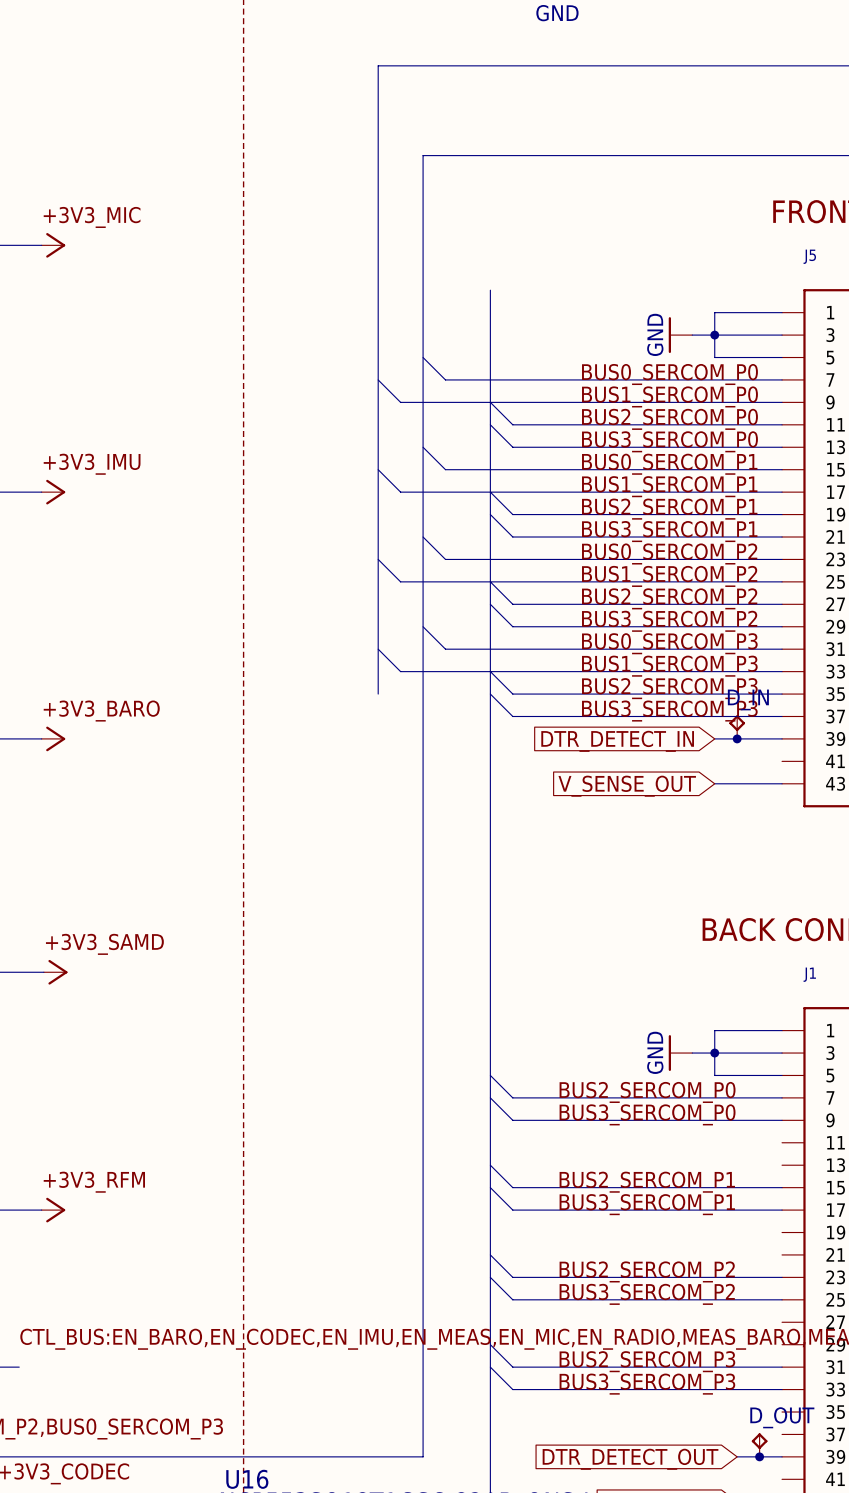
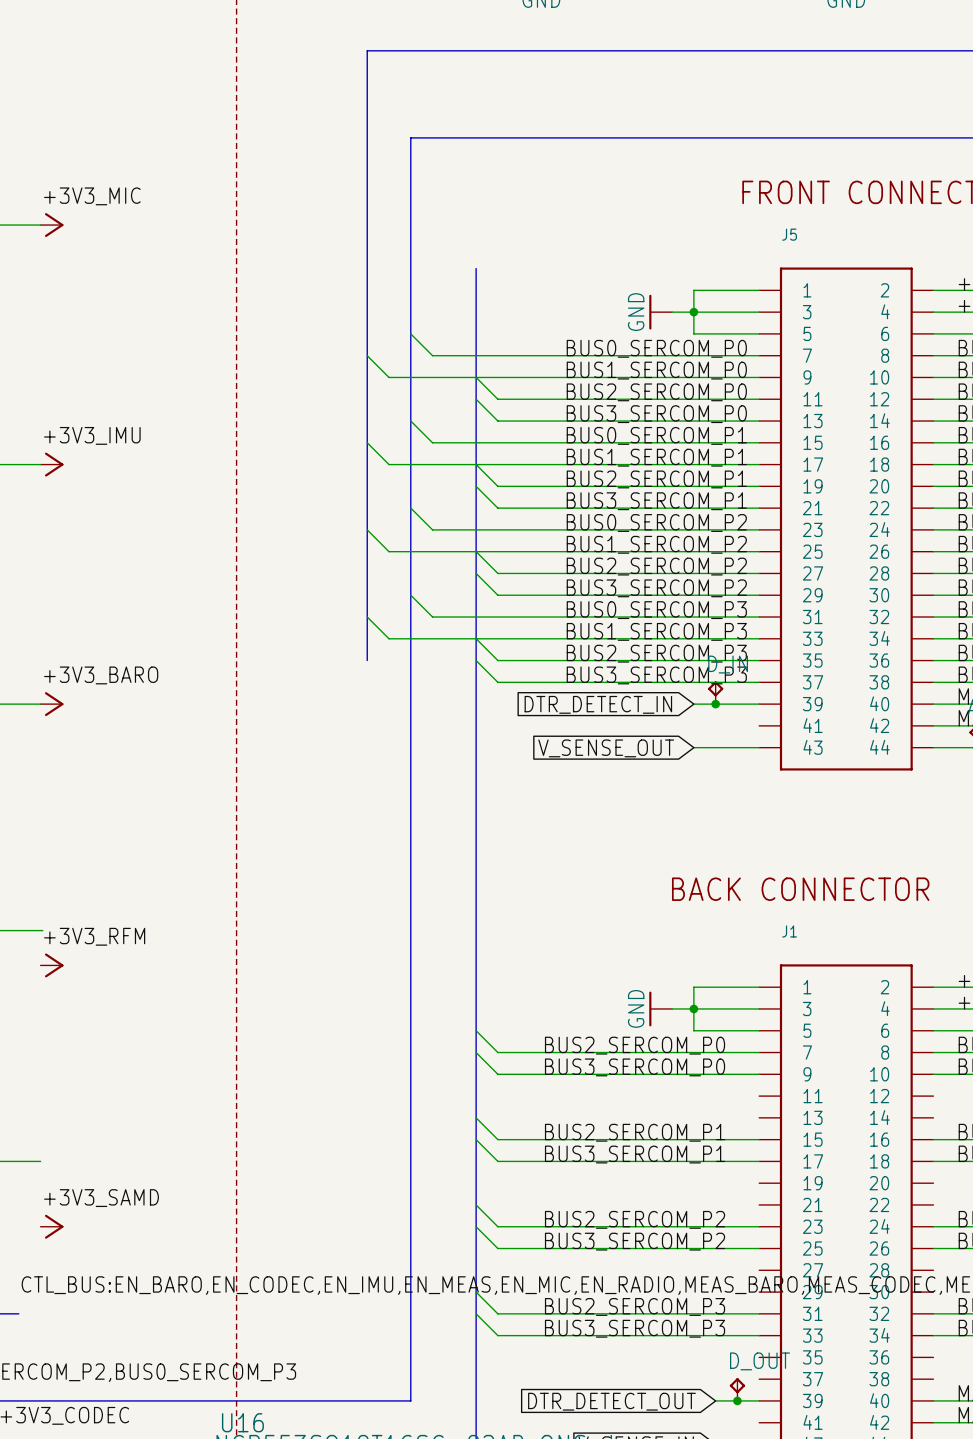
label: +3V3_SAMD (104, 944) -> none
power symbol position: (55, 972) -> (52, 965)
label position: +3V3_RFM (94, 1182) -> +3V3_RFM (94, 936)
power symbol position: (53, 1210) -> (52, 1226)
label: none -> +3V3_SAMD (101, 1198)

